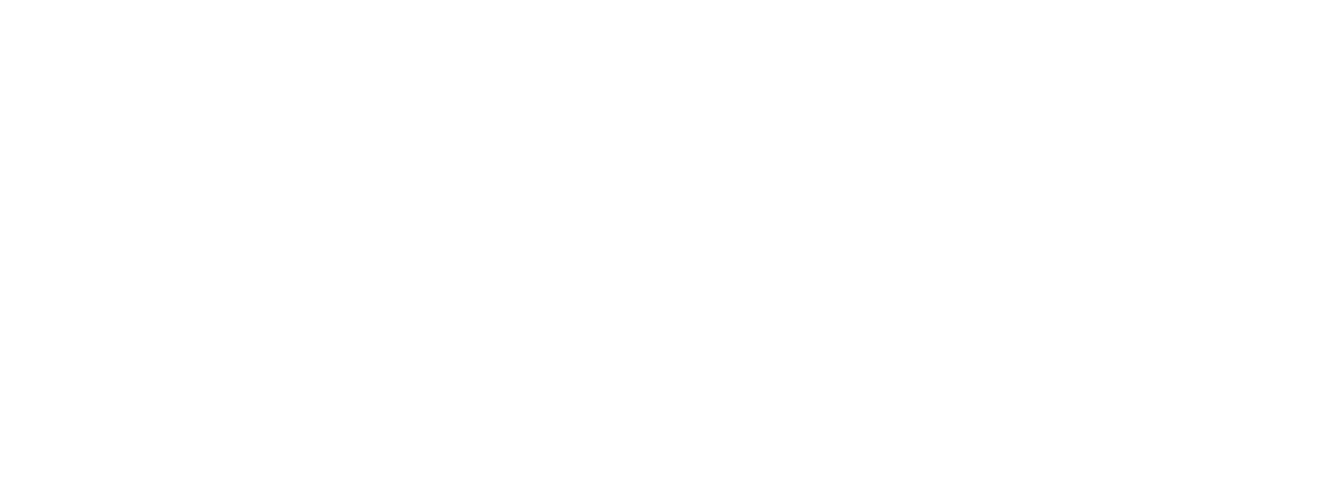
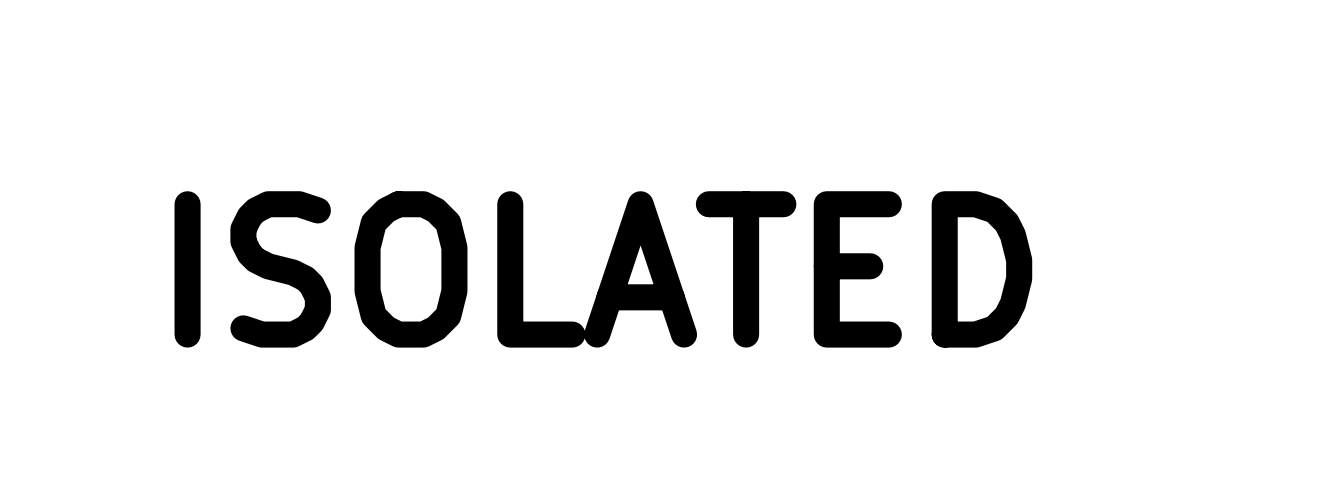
text: none -> ISOLATED (603, 269)

